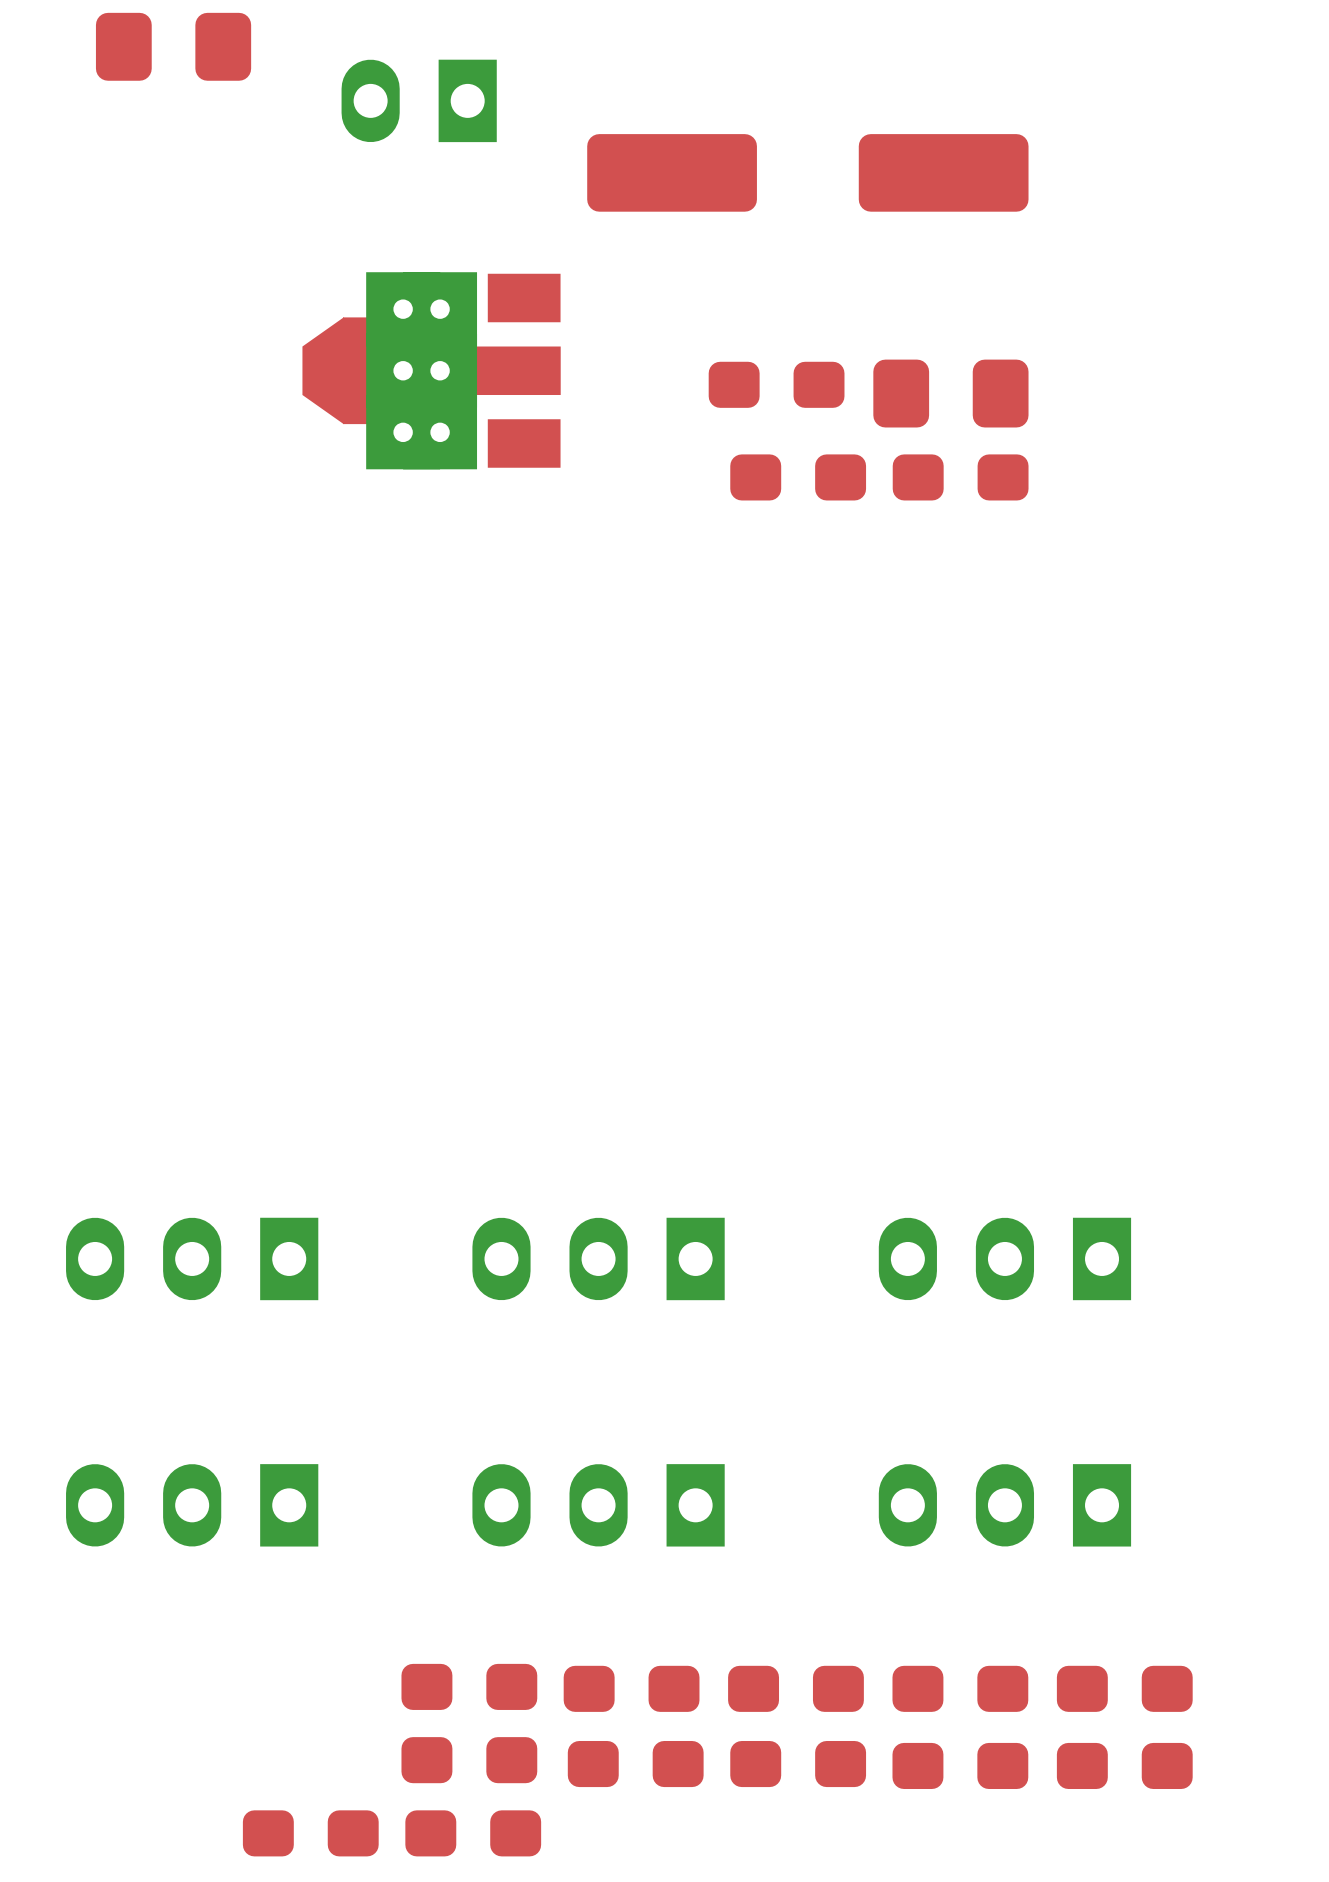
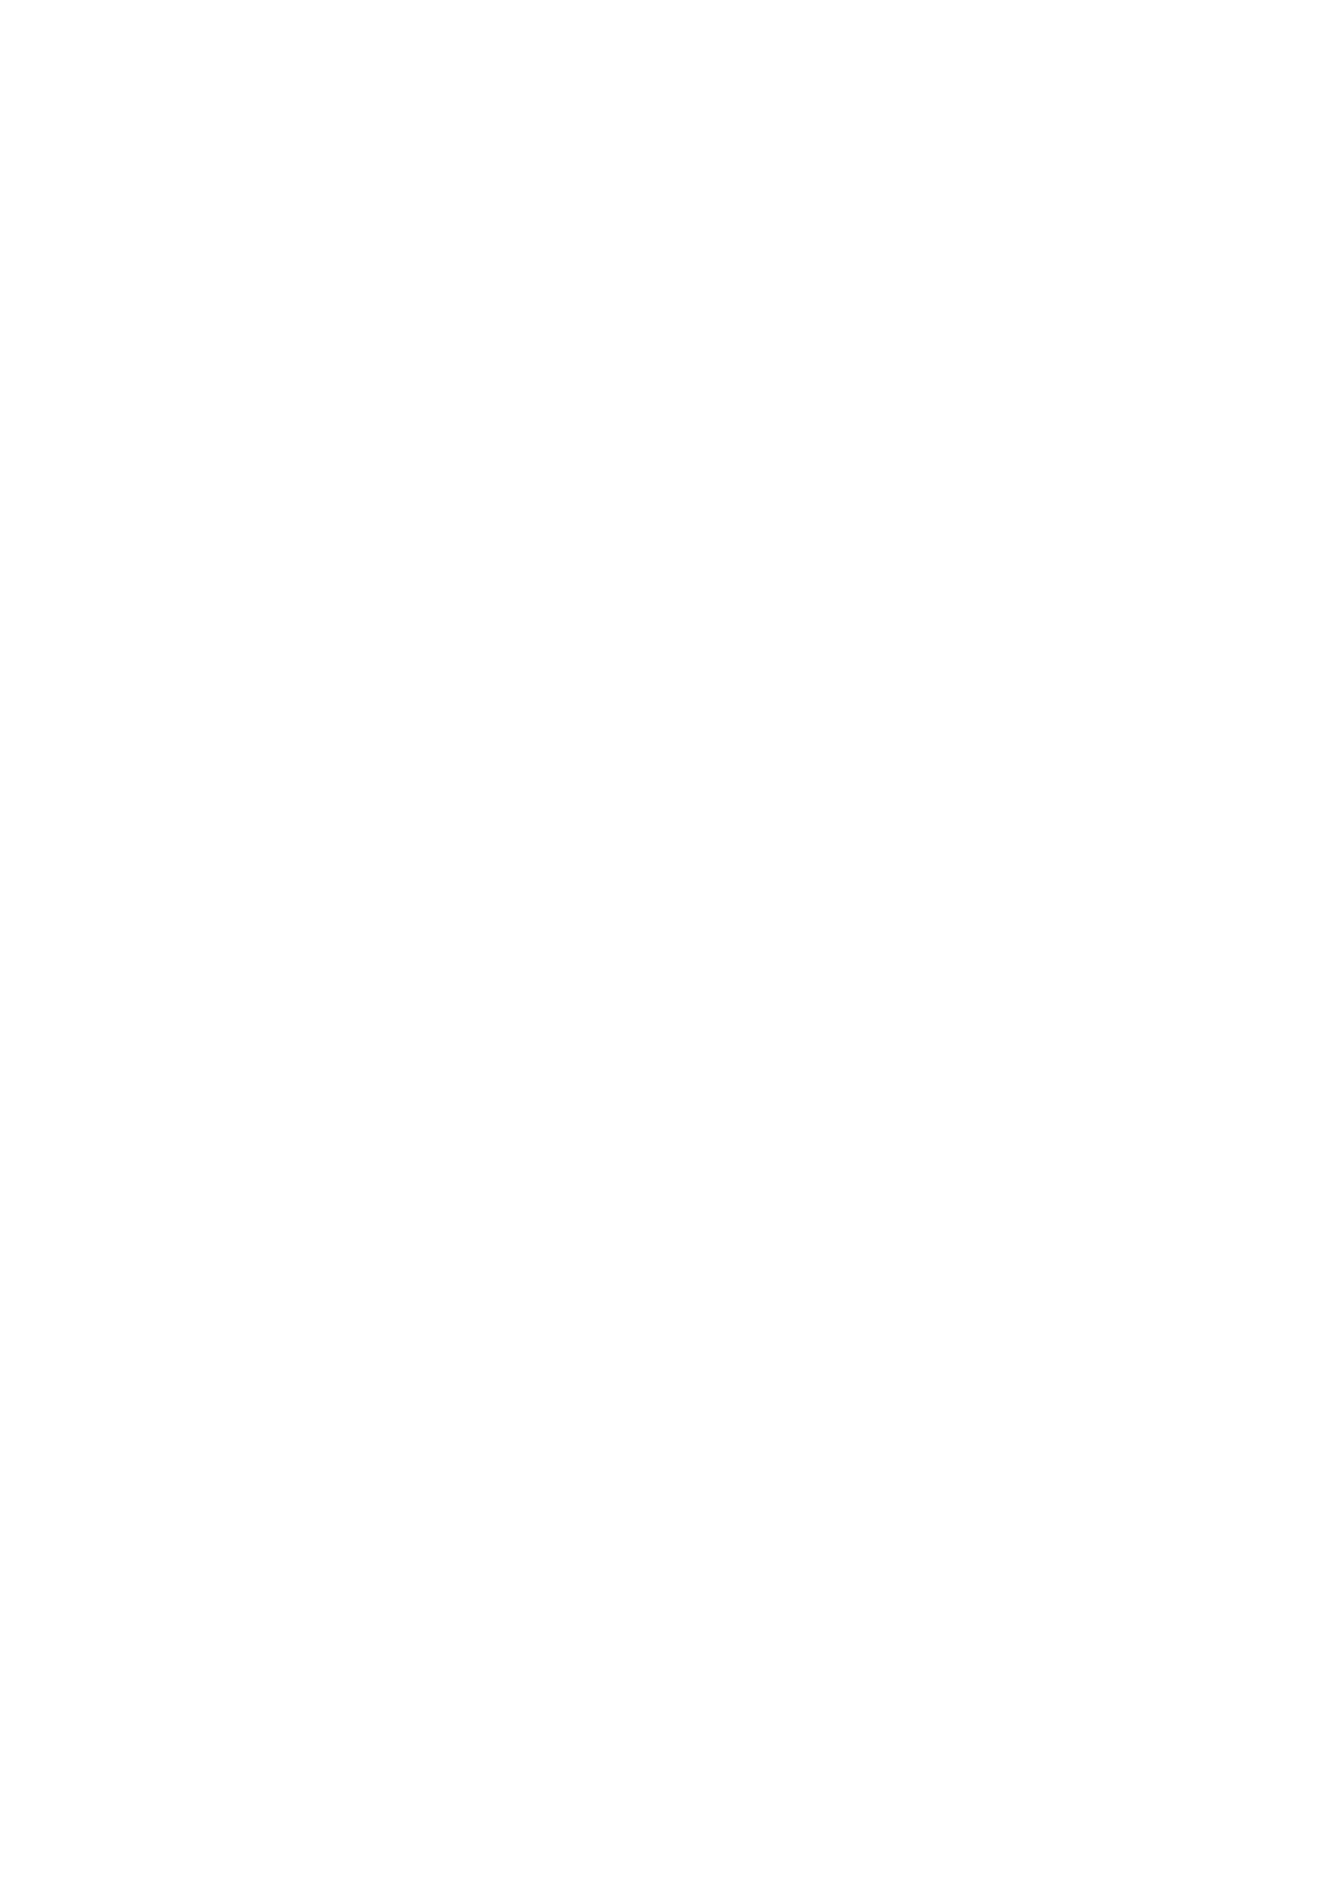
part: (173, 46) -> none
part: (419, 100) -> none
part: (807, 172) -> none
part: (431, 370) -> none
part: (776, 384) -> none
part: (950, 393) -> none
part: (798, 477) -> none
part: (960, 477) -> none
part: (192, 1258) -> none
part: (598, 1258) -> none
part: (1004, 1258) -> none
part: (192, 1505) -> none
part: (598, 1505) -> none
part: (1004, 1505) -> none
part: (469, 1686) -> none
part: (631, 1688) -> none
part: (795, 1688) -> none
part: (960, 1688) -> none
part: (1124, 1688) -> none
part: (469, 1760) -> none
part: (635, 1764) -> none
part: (798, 1764) -> none
part: (960, 1765) -> none
part: (1124, 1765) -> none
part: (310, 1833) -> none
part: (473, 1833) -> none

